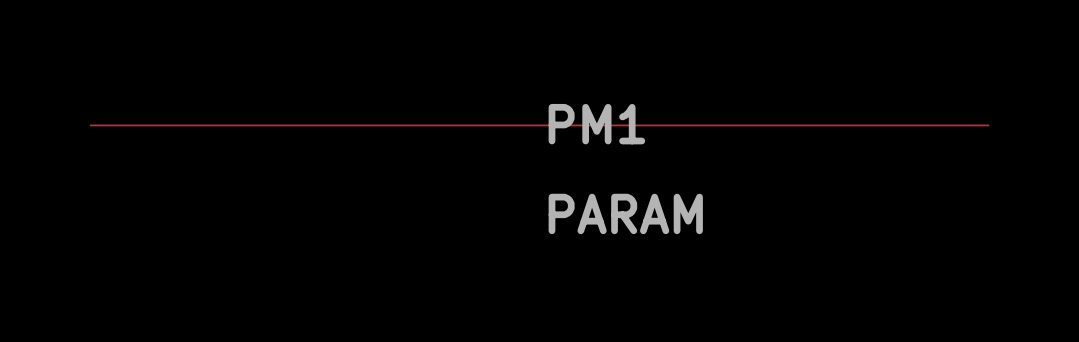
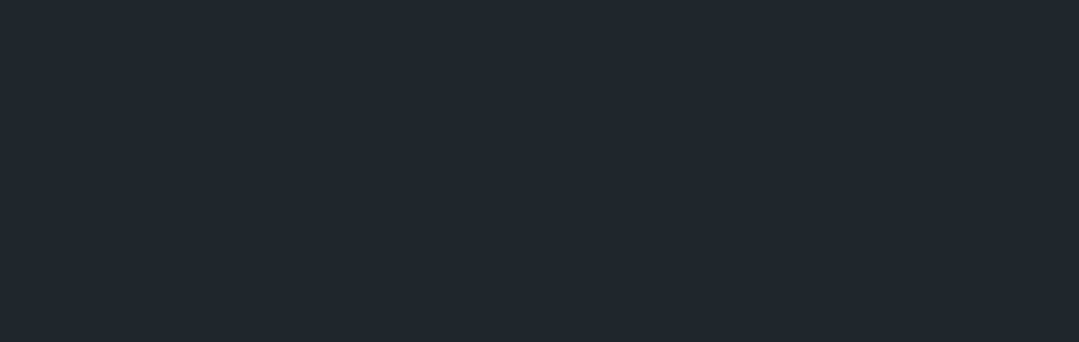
PM1: PARAM (539, 125) -> none

